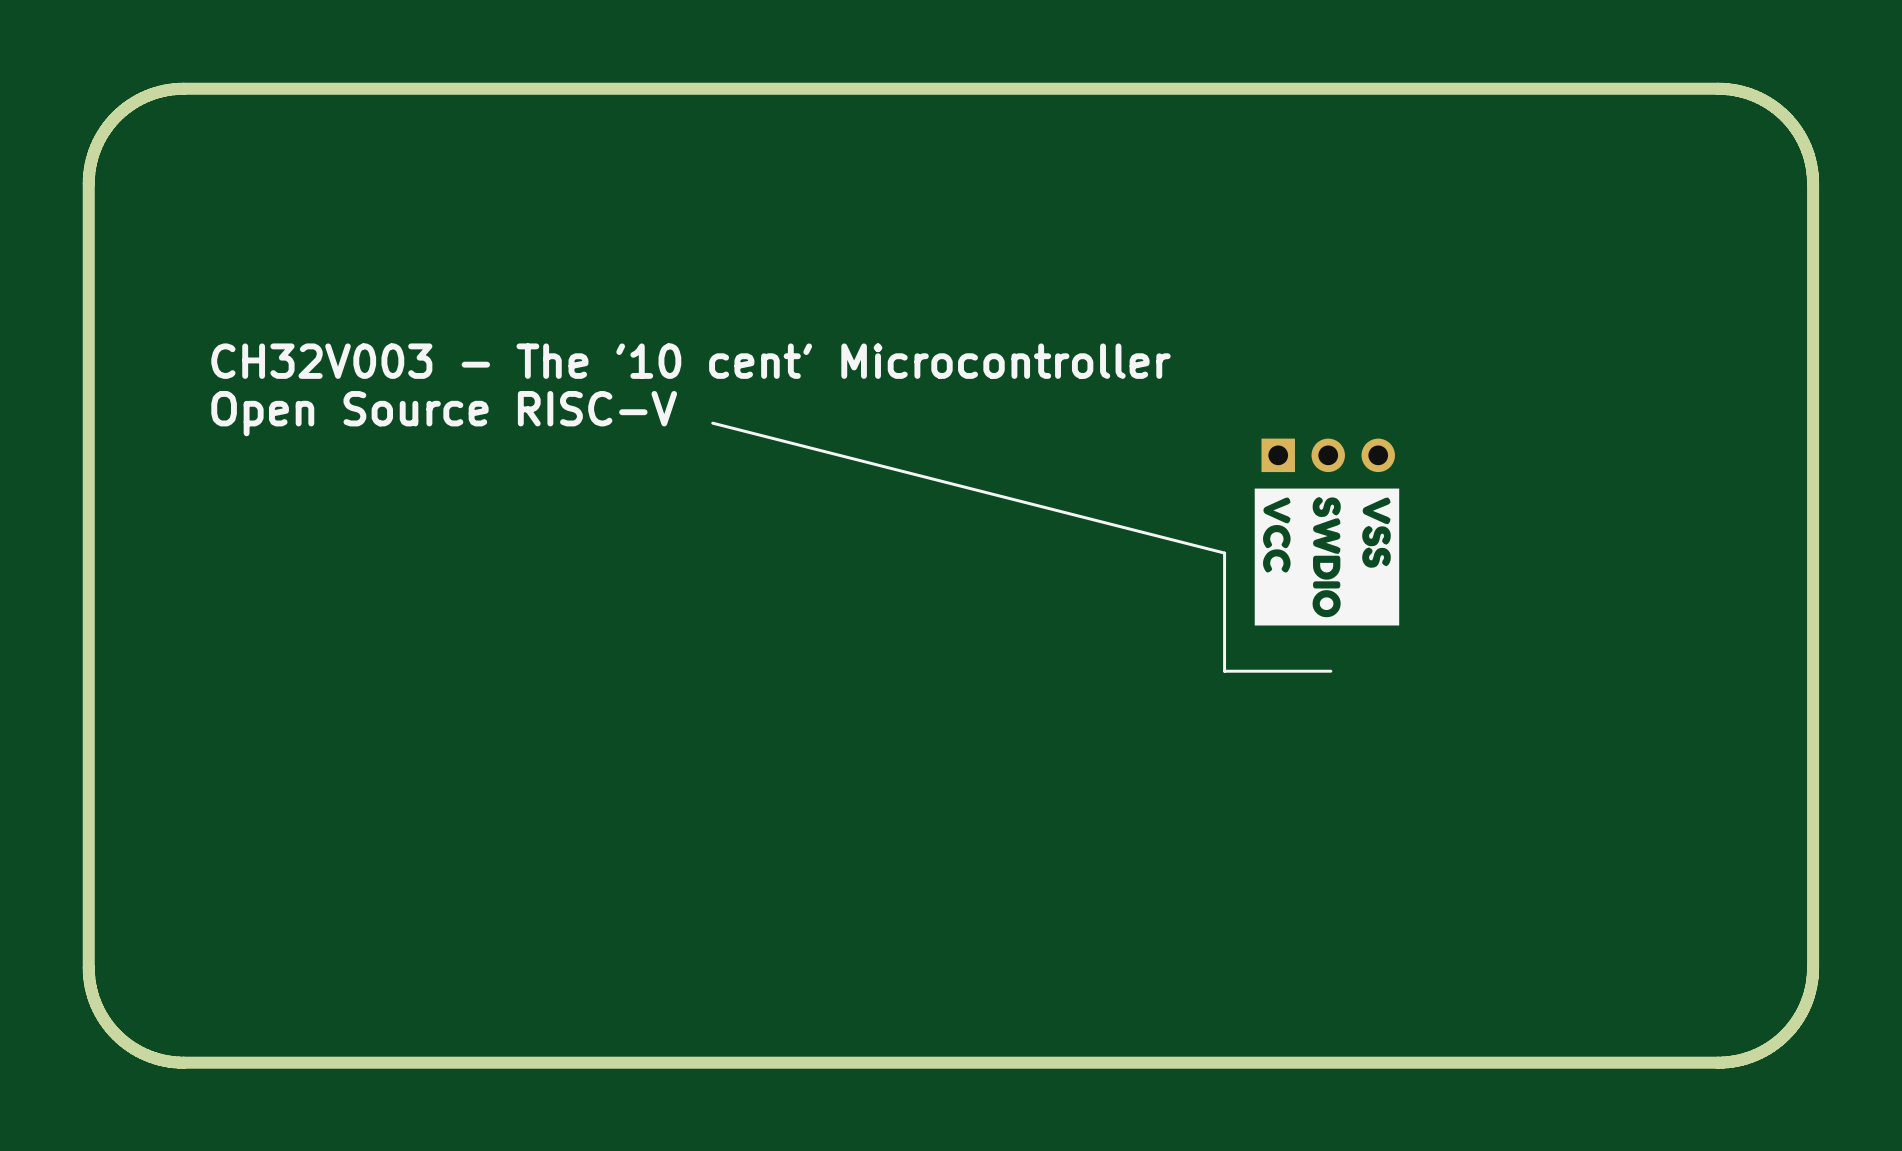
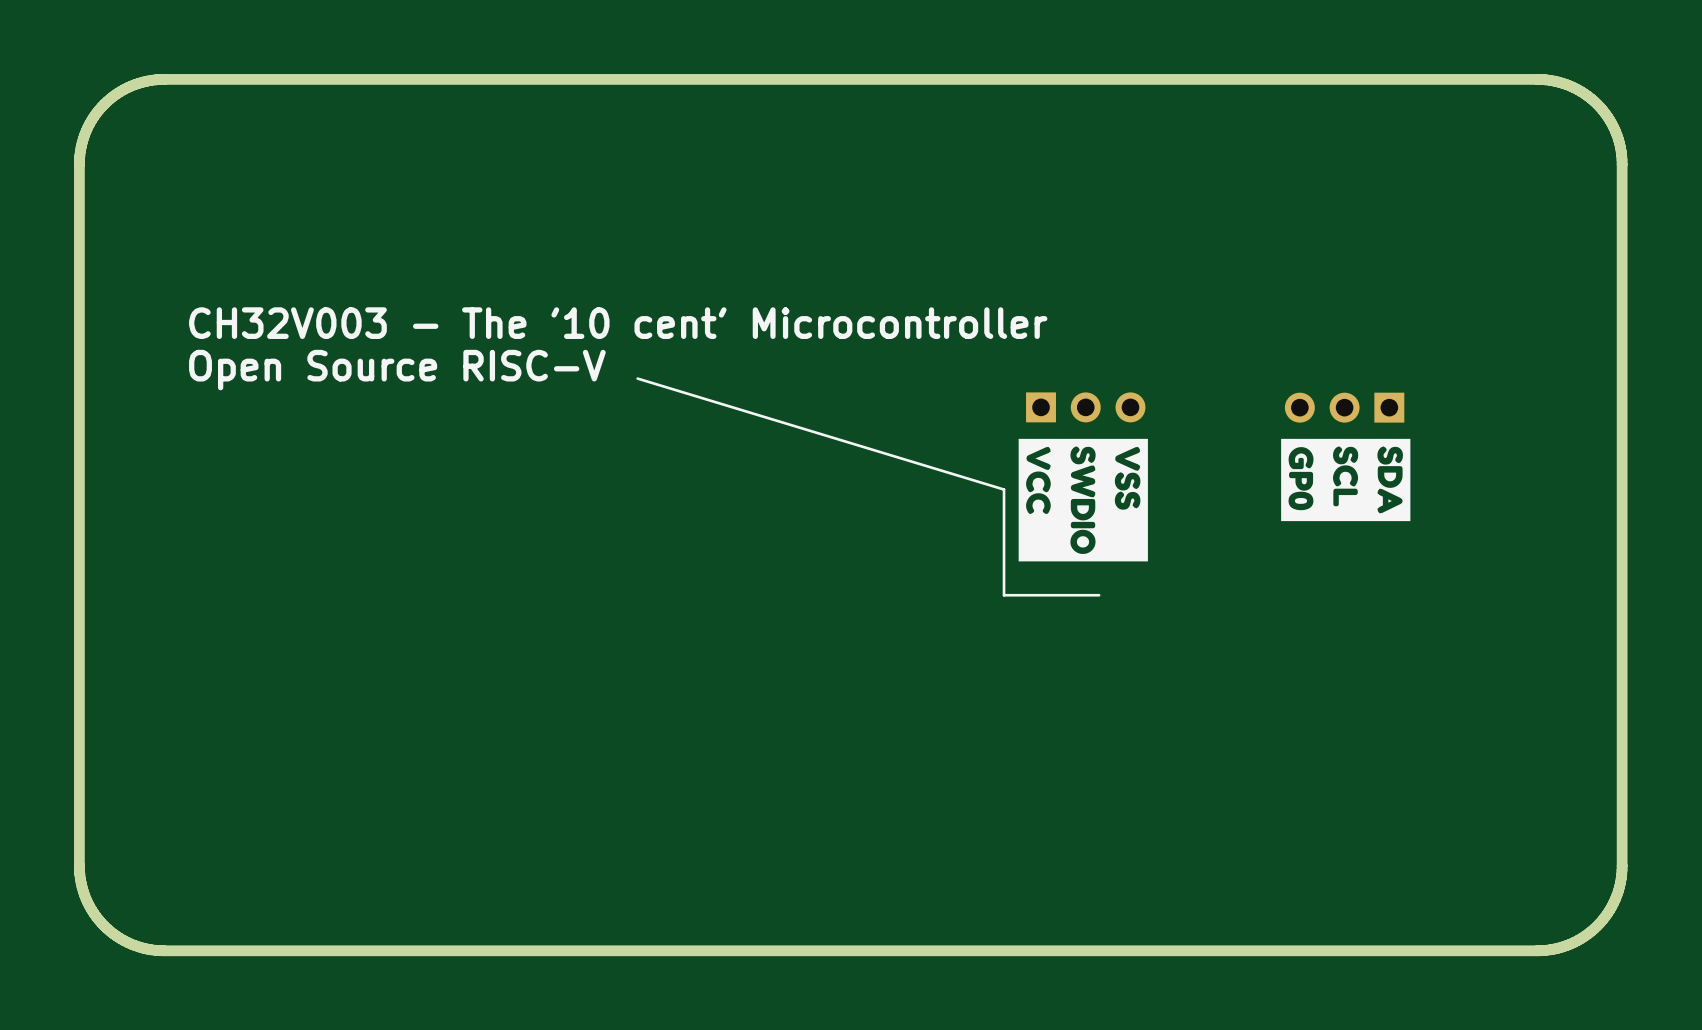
line: (712, 423) (1224, 553) (1224, 671) (1330, 671) -> (637, 378) (1004, 489) (1004, 595) (1099, 595)
part: none -> (1085, 407)
part: (1328, 455) -> none
part: none -> (1344, 407)
drawing: none -> [1281, 438, 1411, 522]
drawing position: (1326, 557) -> (1083, 500)

